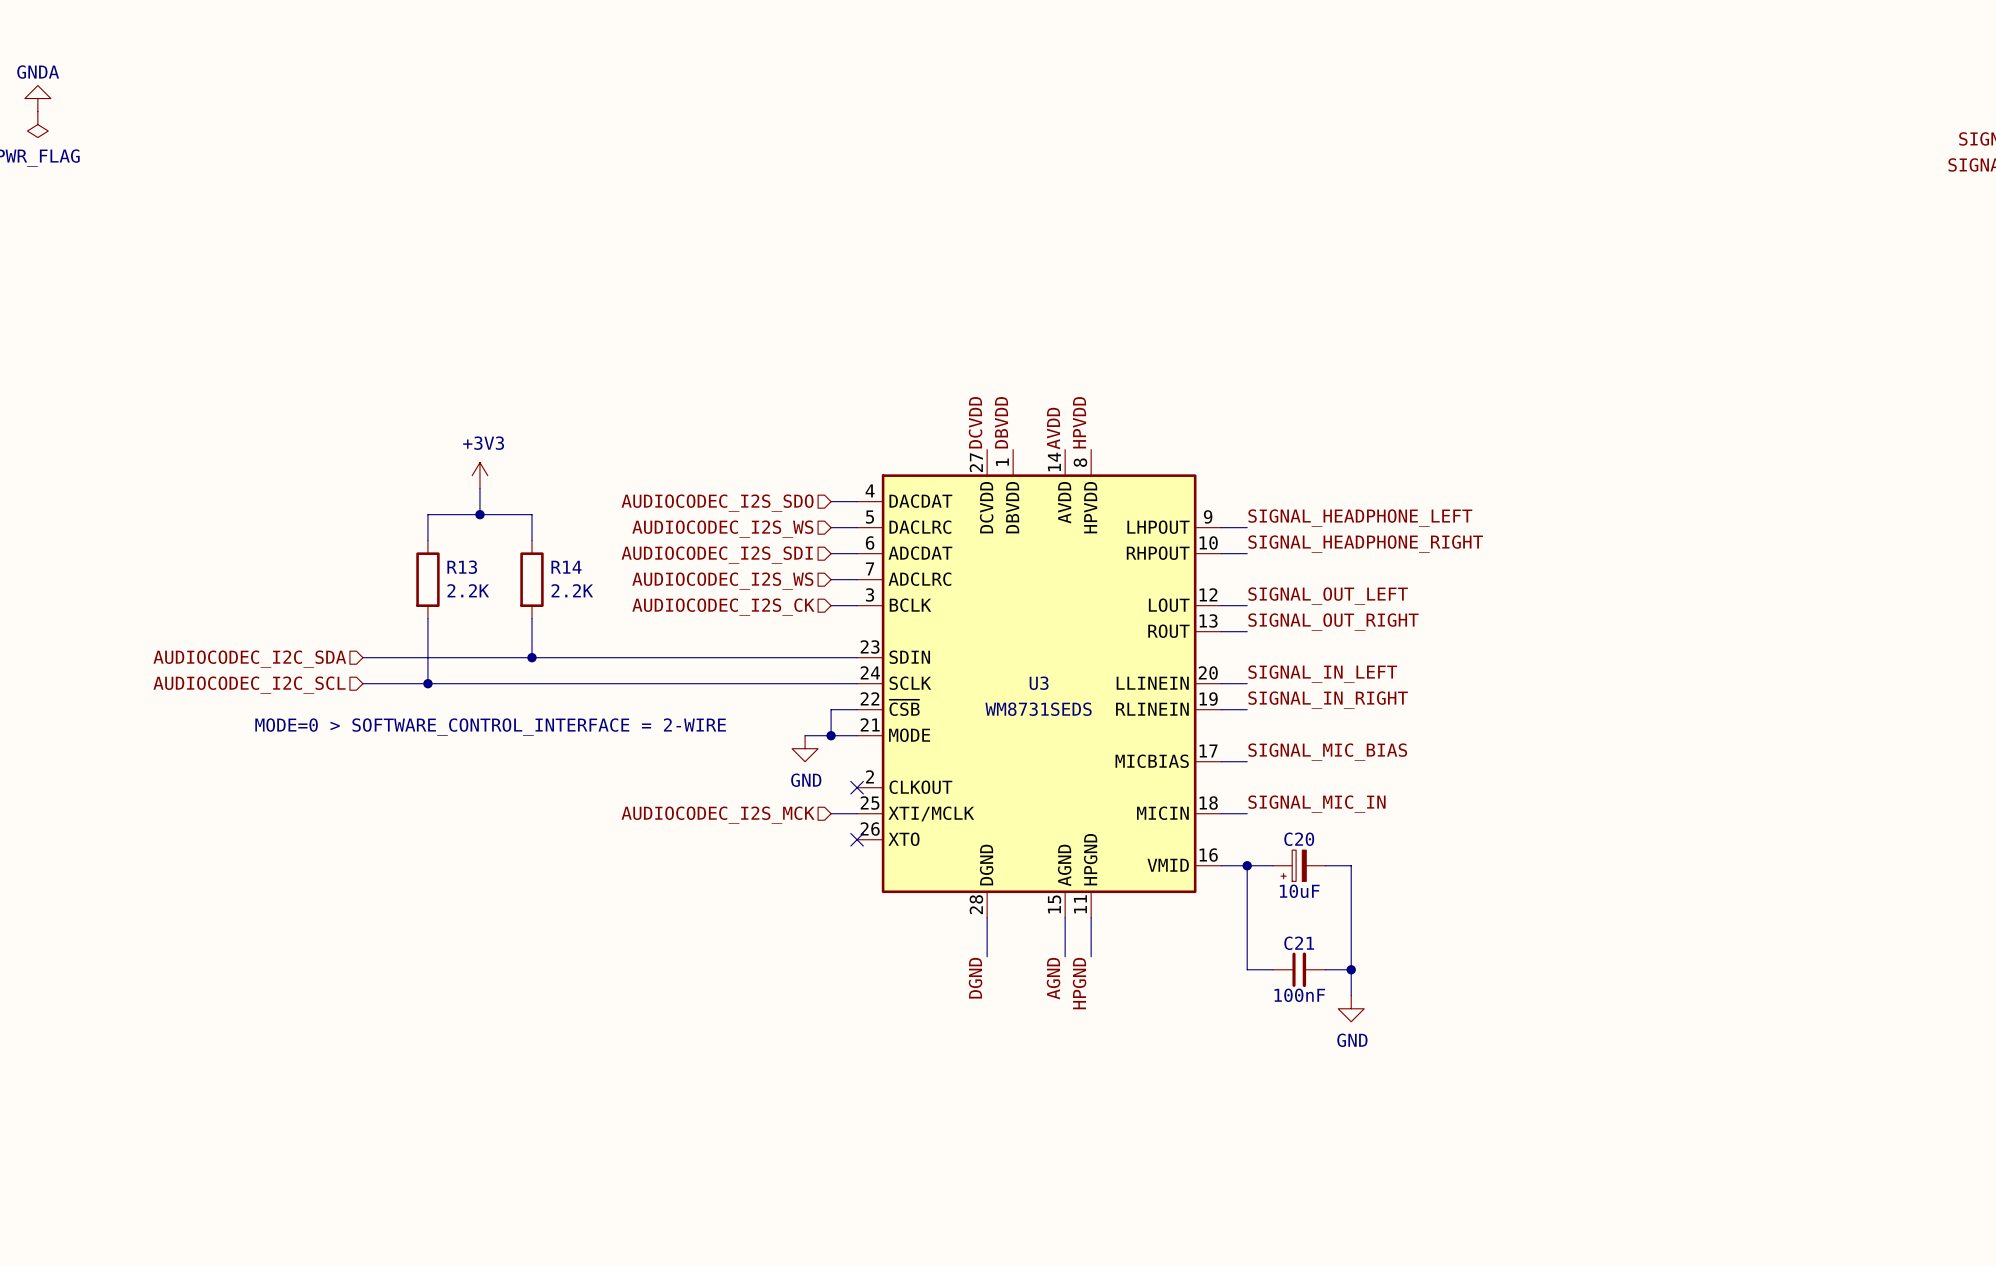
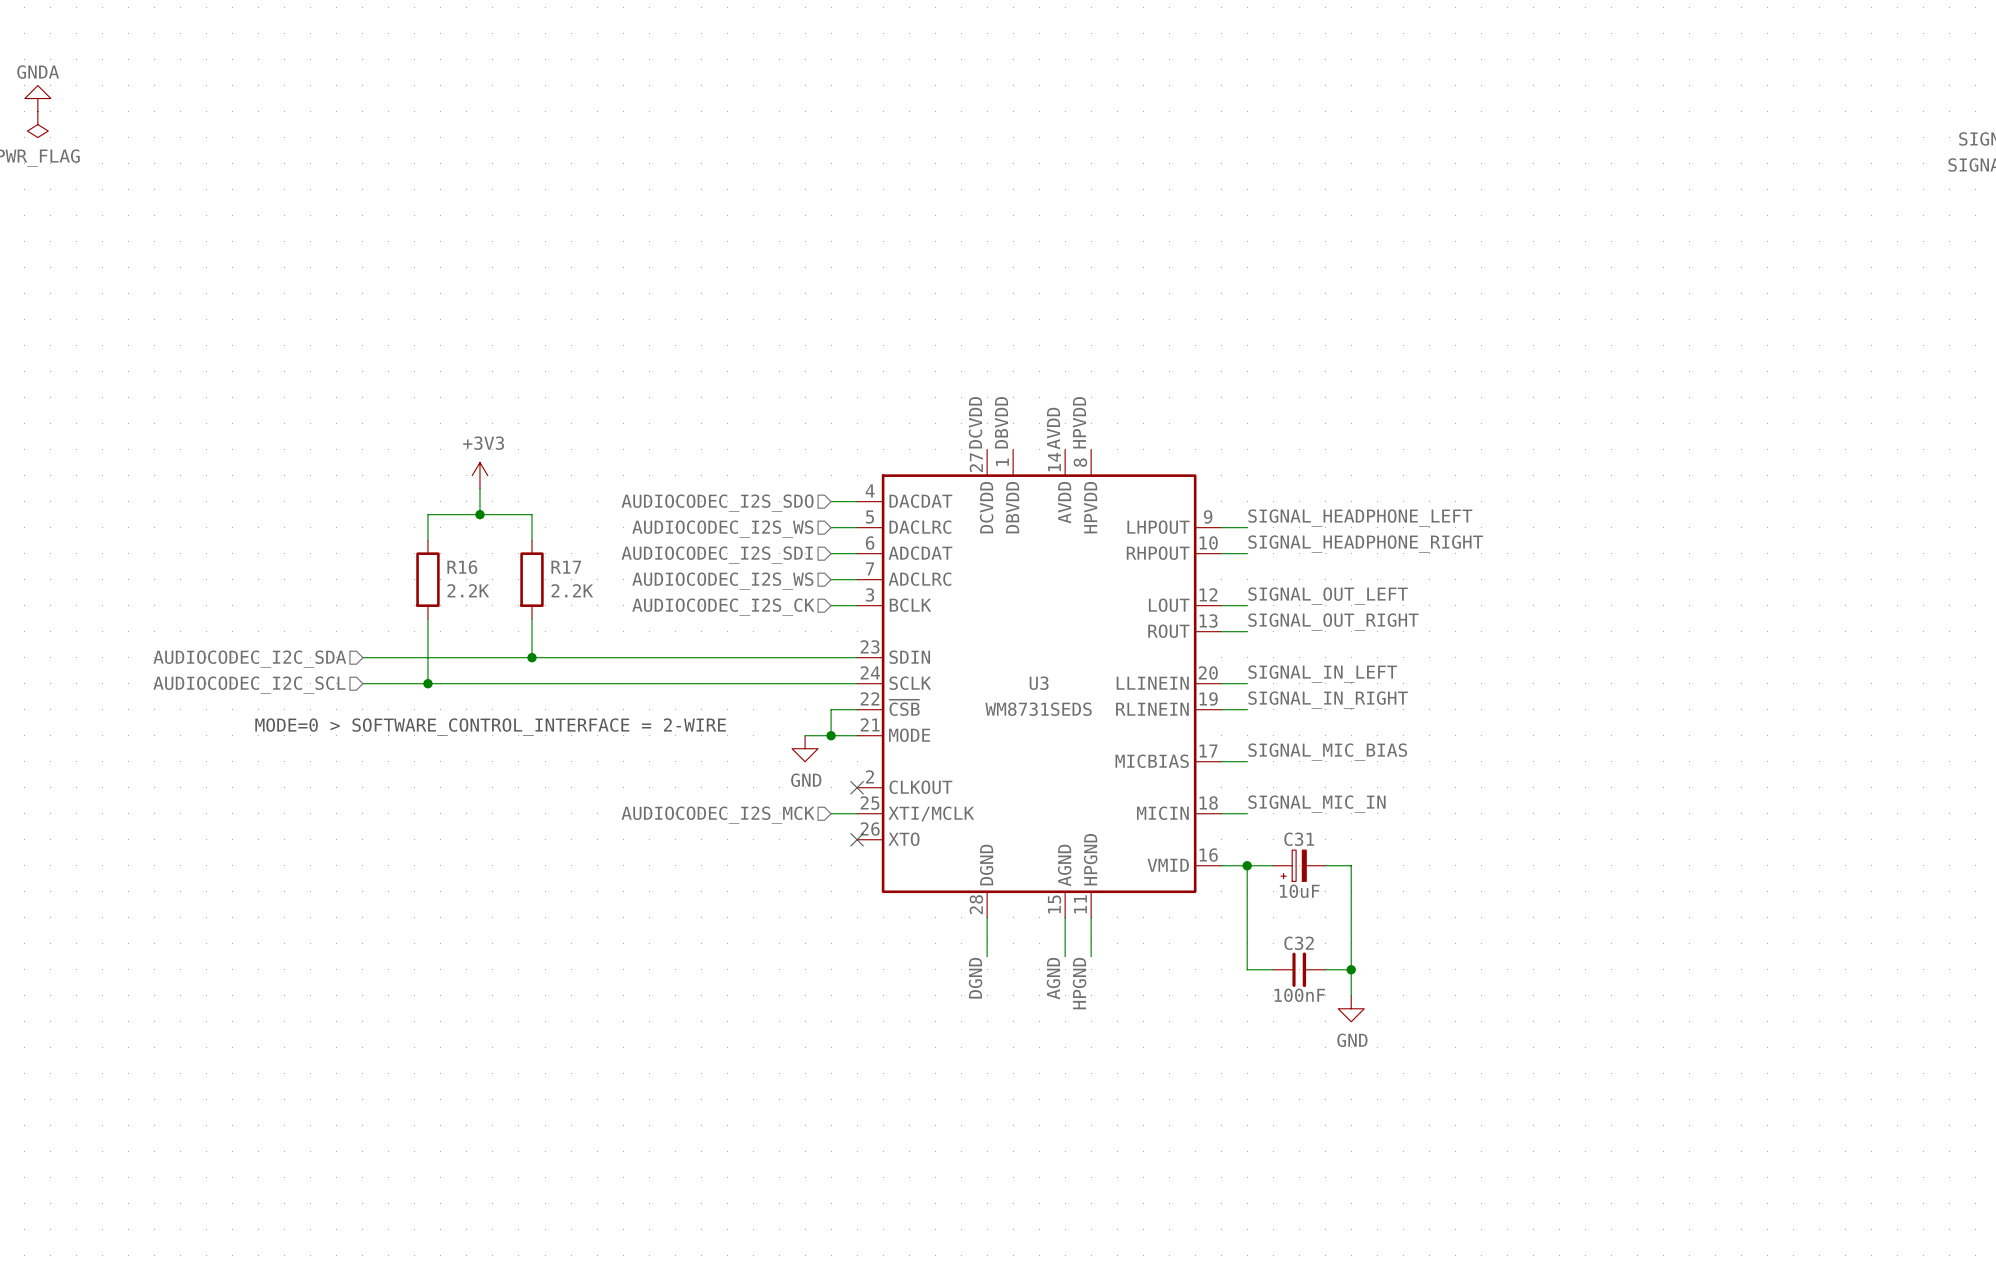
R13 name: R13 (462, 567) -> R16 (462, 567)
R14 name: R14 (566, 567) -> R17 (566, 567)
C20 name: C20 (1299, 839) -> C31 (1299, 839)
C21 name: C21 (1299, 943) -> C32 (1299, 943)

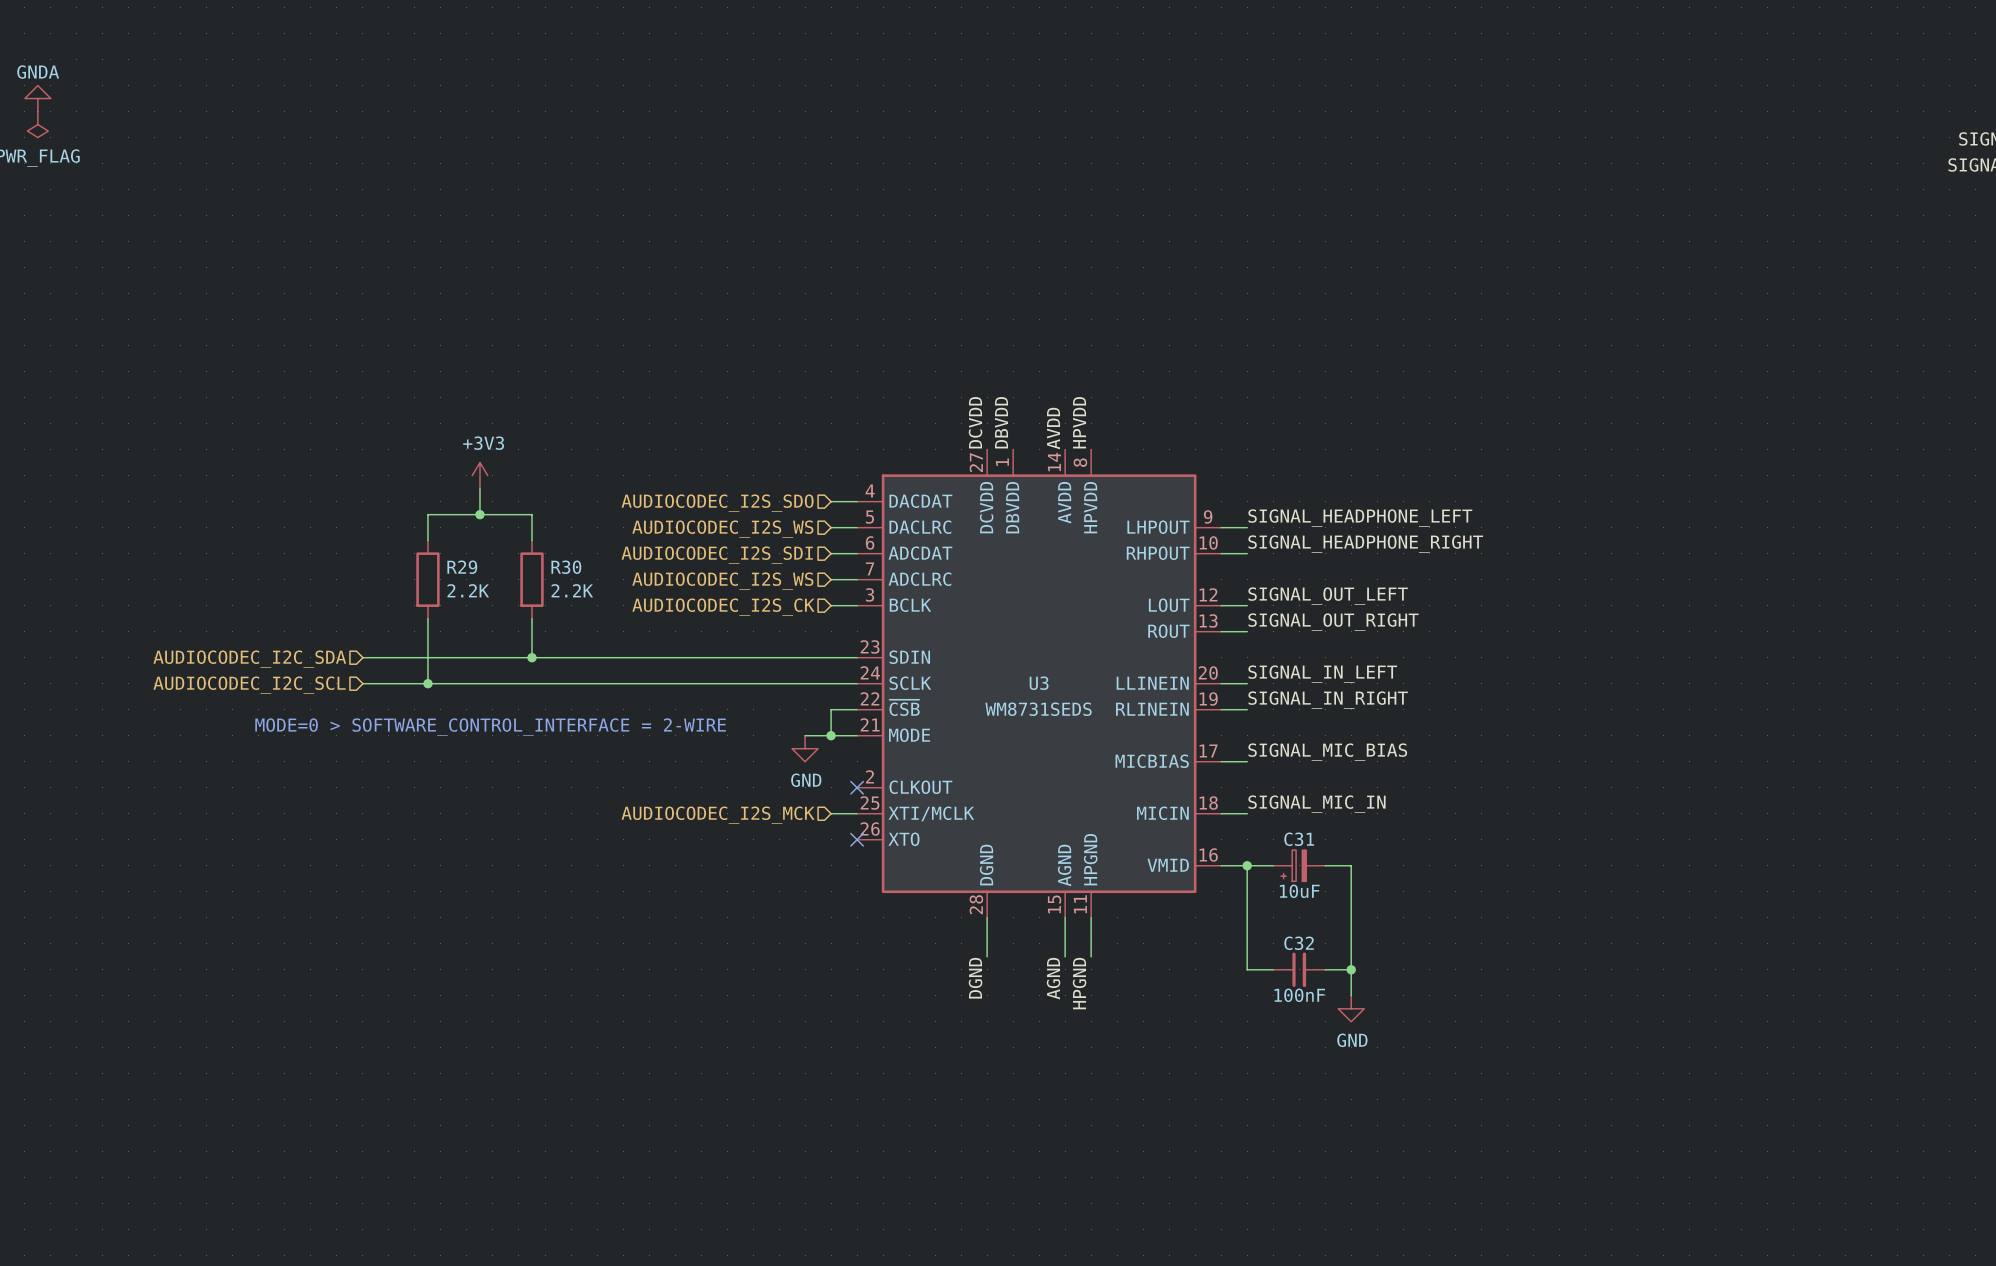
R16 name: R16 (462, 567) -> R29 (462, 567)
R17 name: R17 (566, 567) -> R30 (566, 567)

